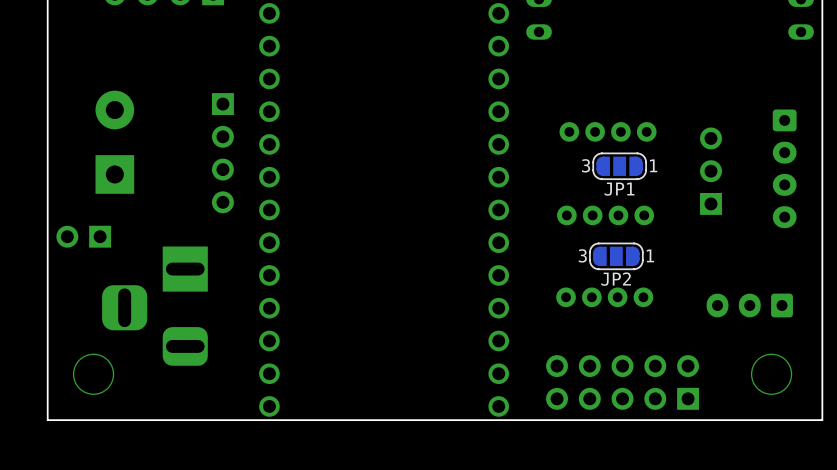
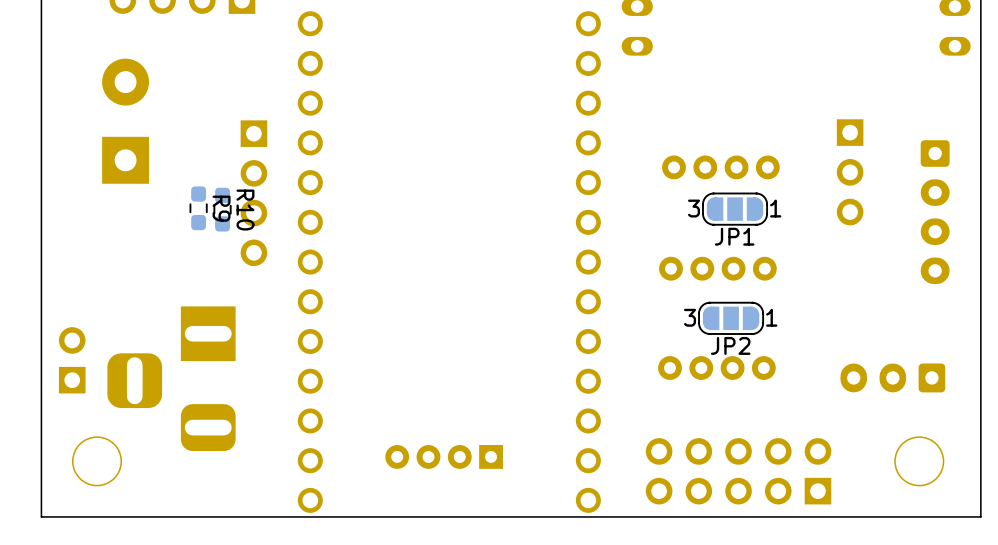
part position: (114, 142) -> (125, 121)
R9: none -> (198, 208)
R10: none -> (222, 209)
part rotation: 0° (710, 171) -> 180° (850, 172)
part rotation: 0° (83, 236) -> 90° clockwise (72, 360)
part position: (83, 236) -> (72, 360)
part: none -> (444, 456)

